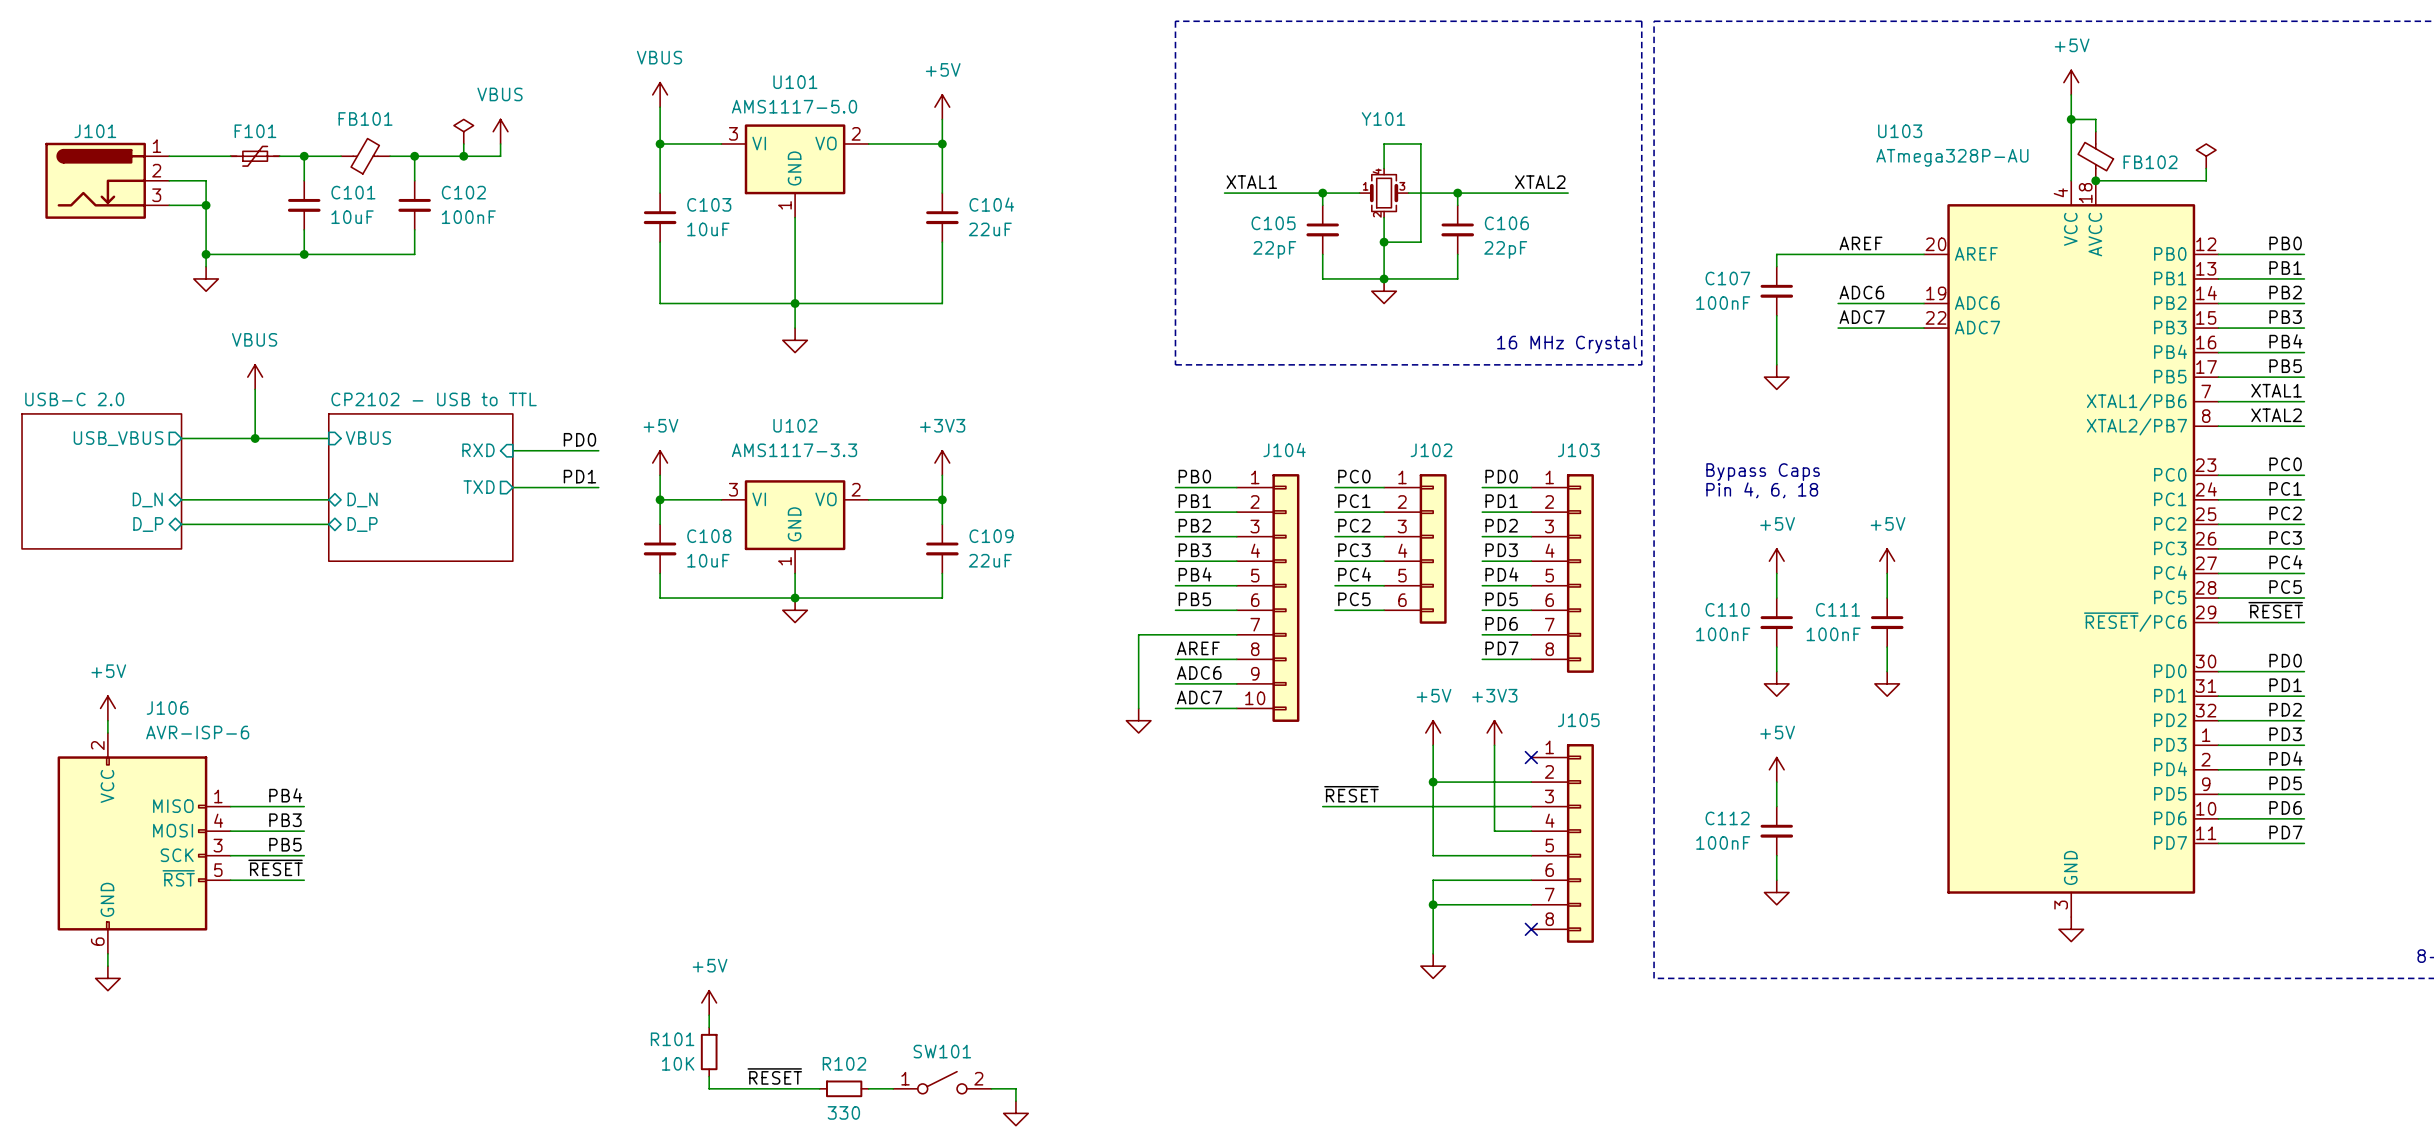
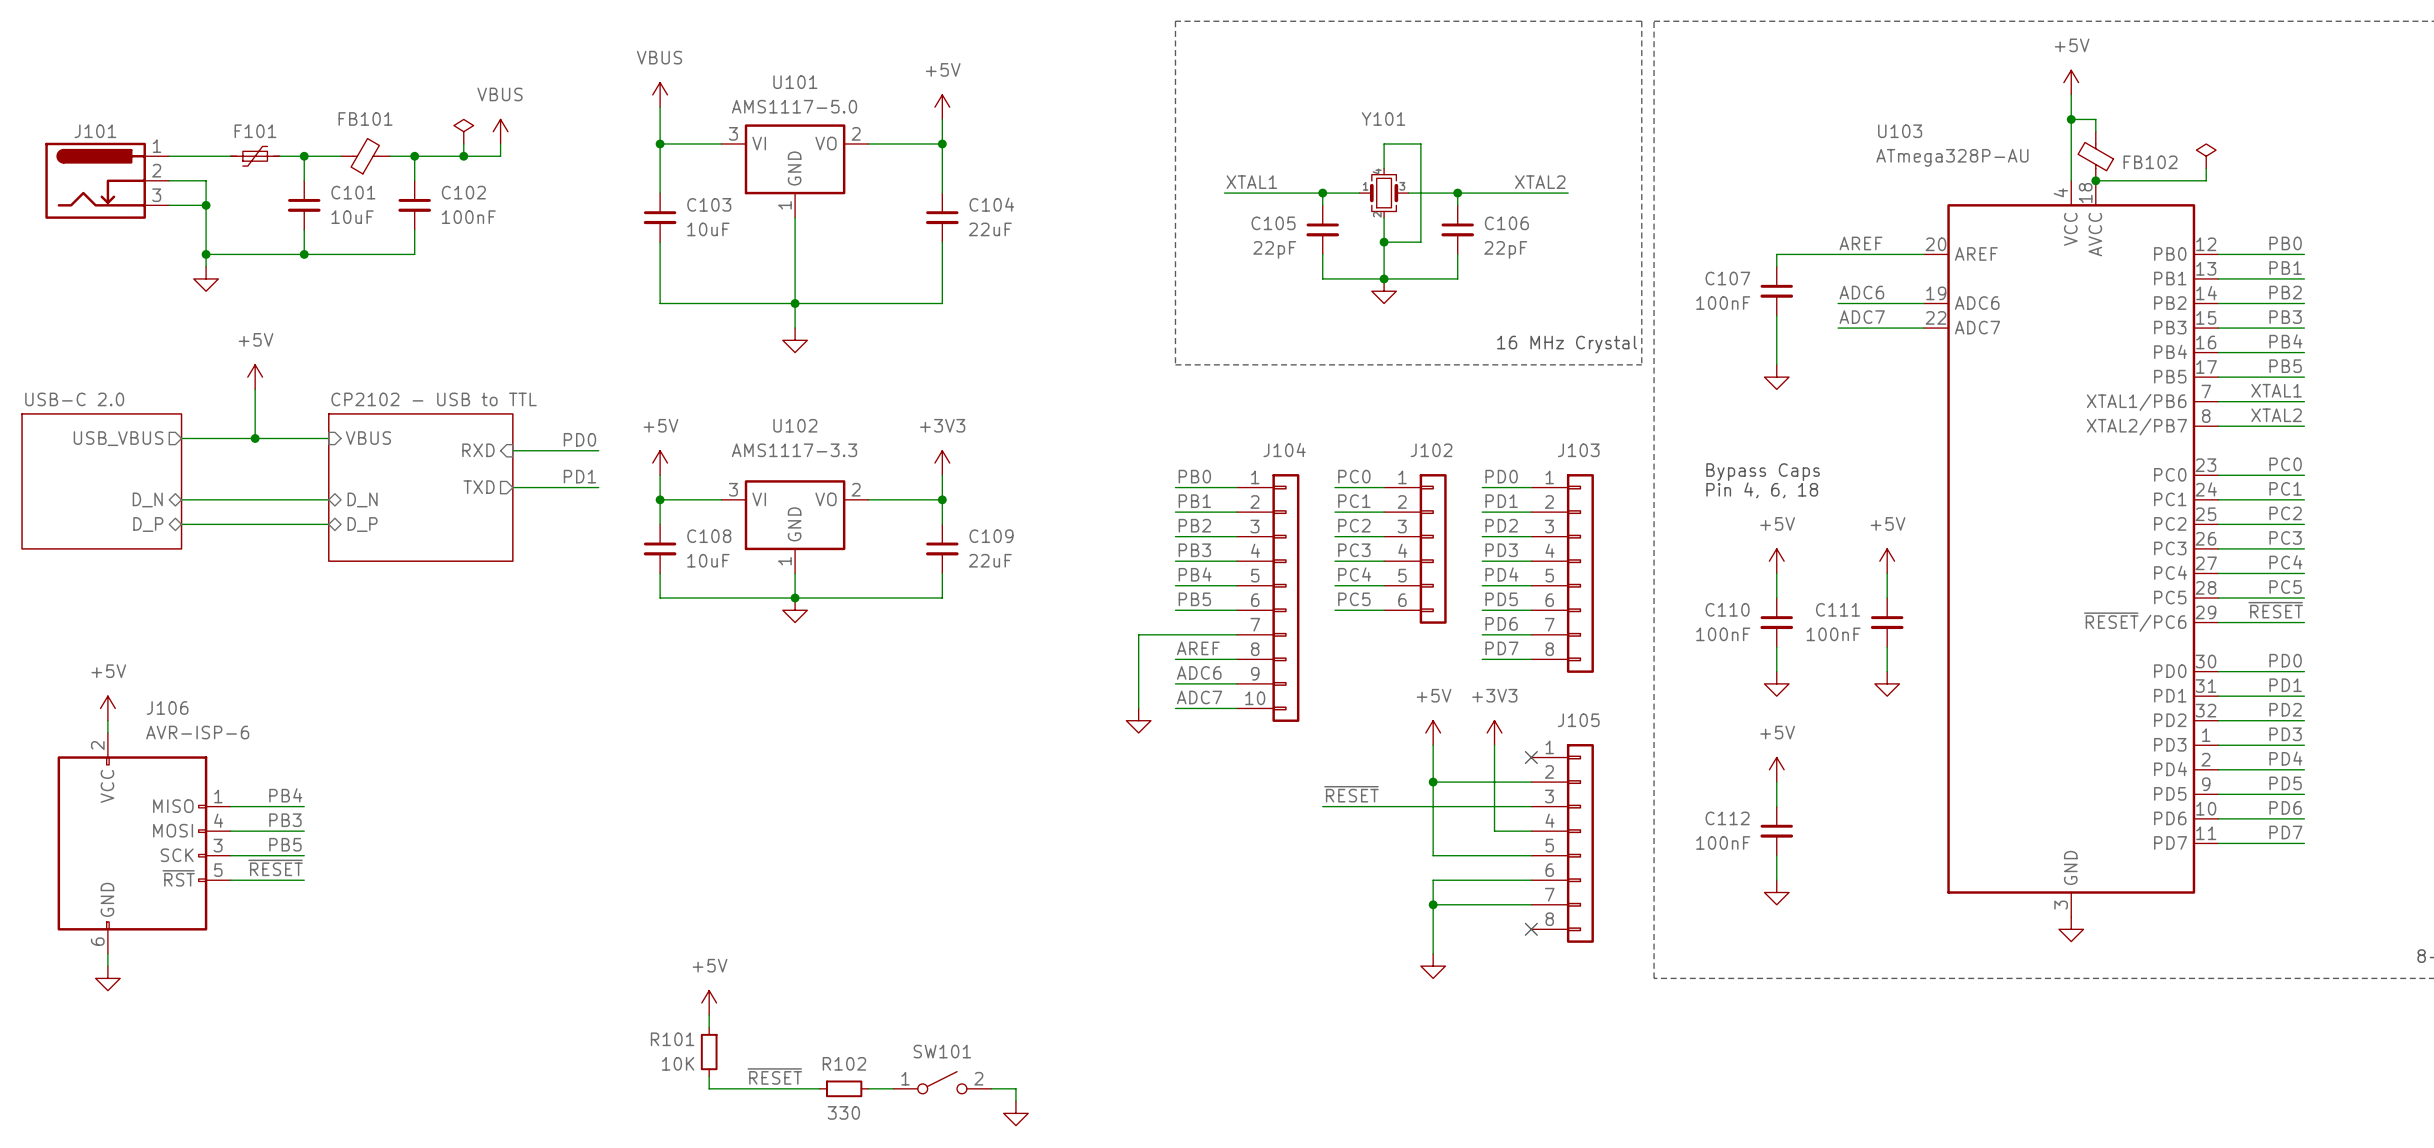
power symbol: VBUS (255, 377) -> +5V (255, 377)

